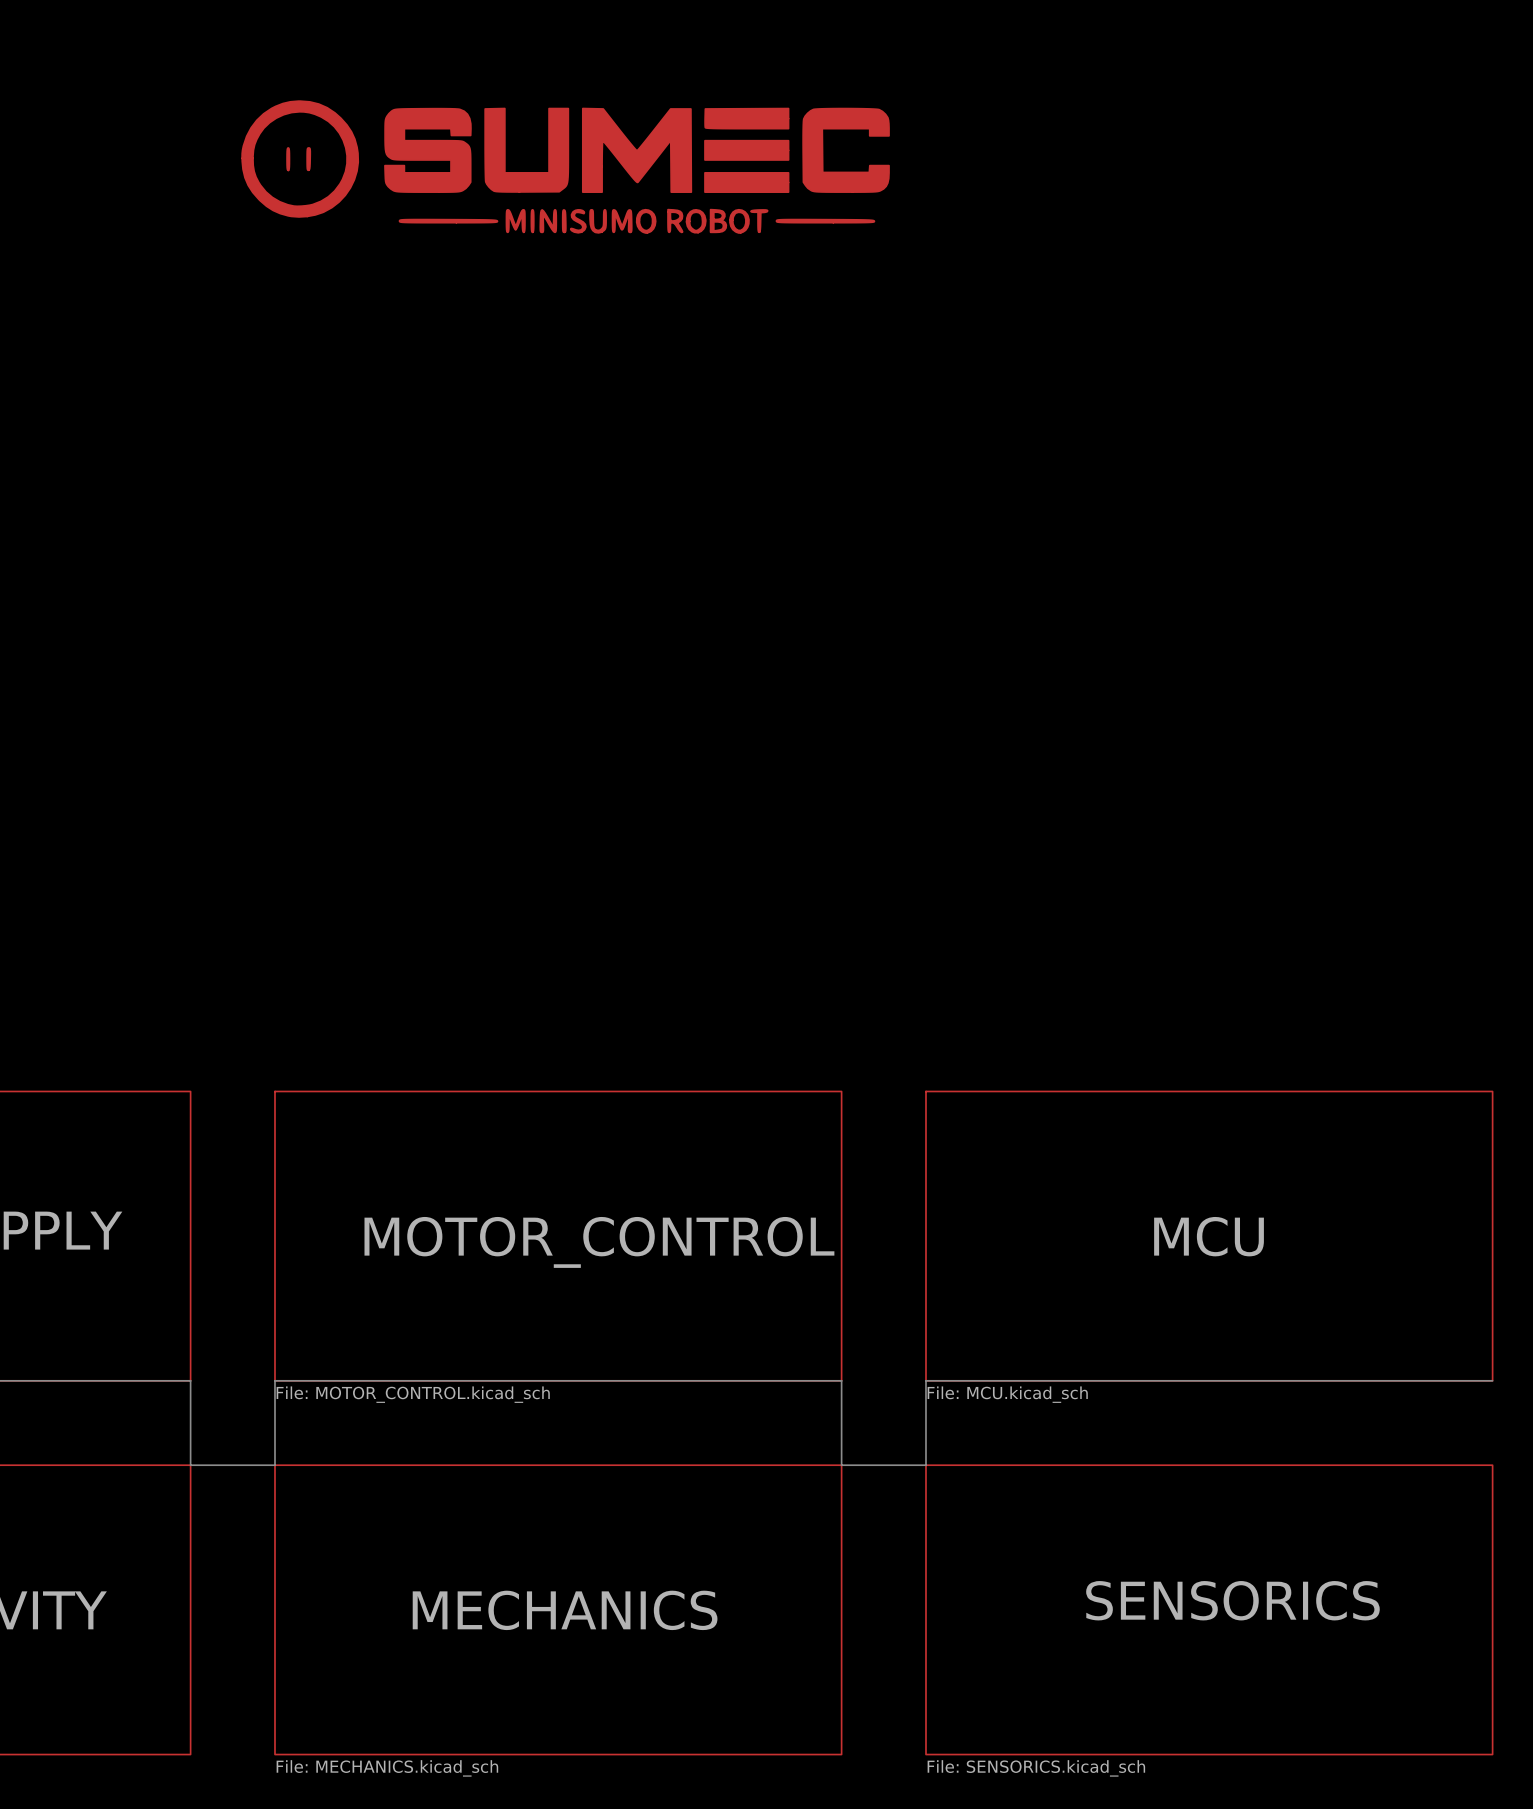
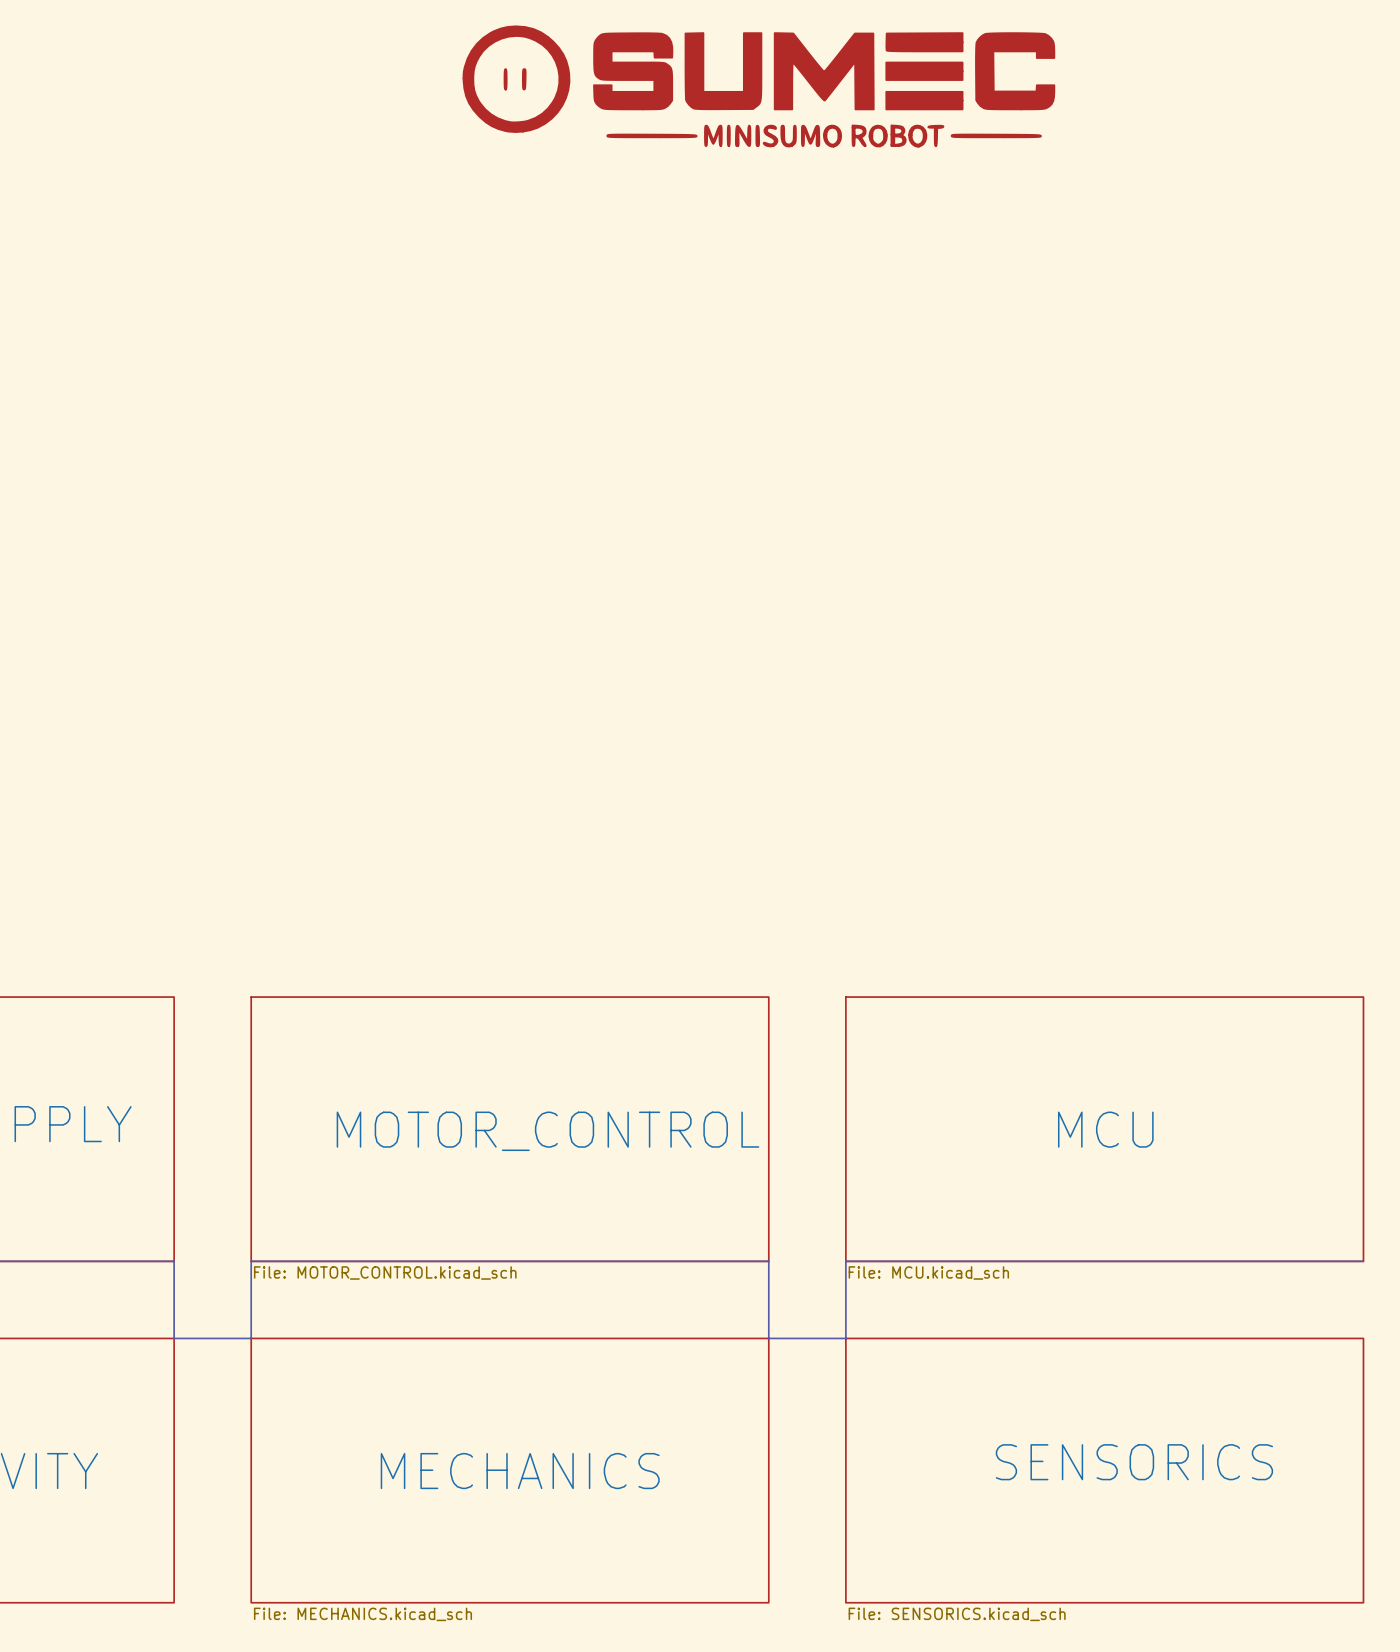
power symbol: none -> (758, 86)
power symbol: (565, 167) -> none

